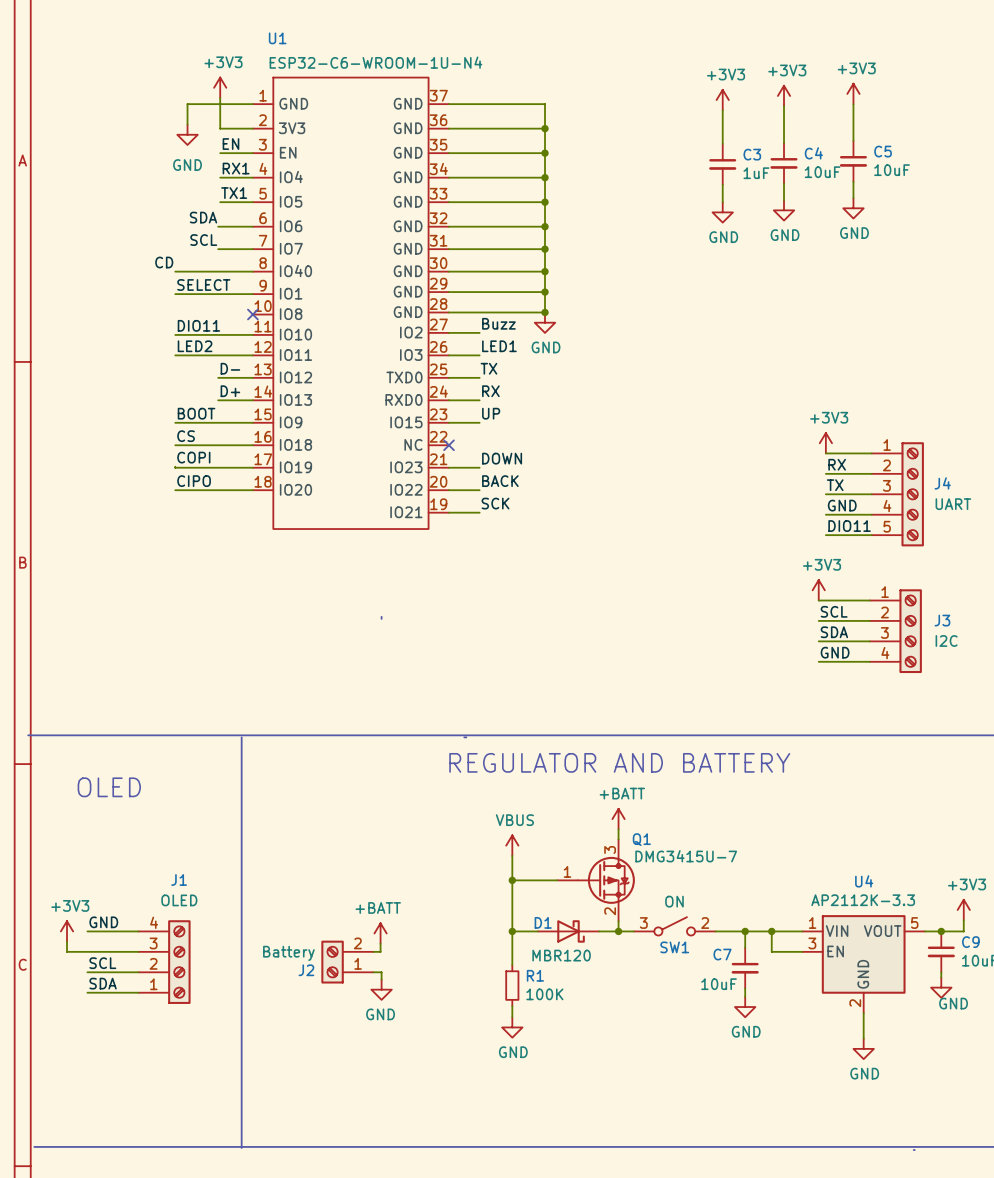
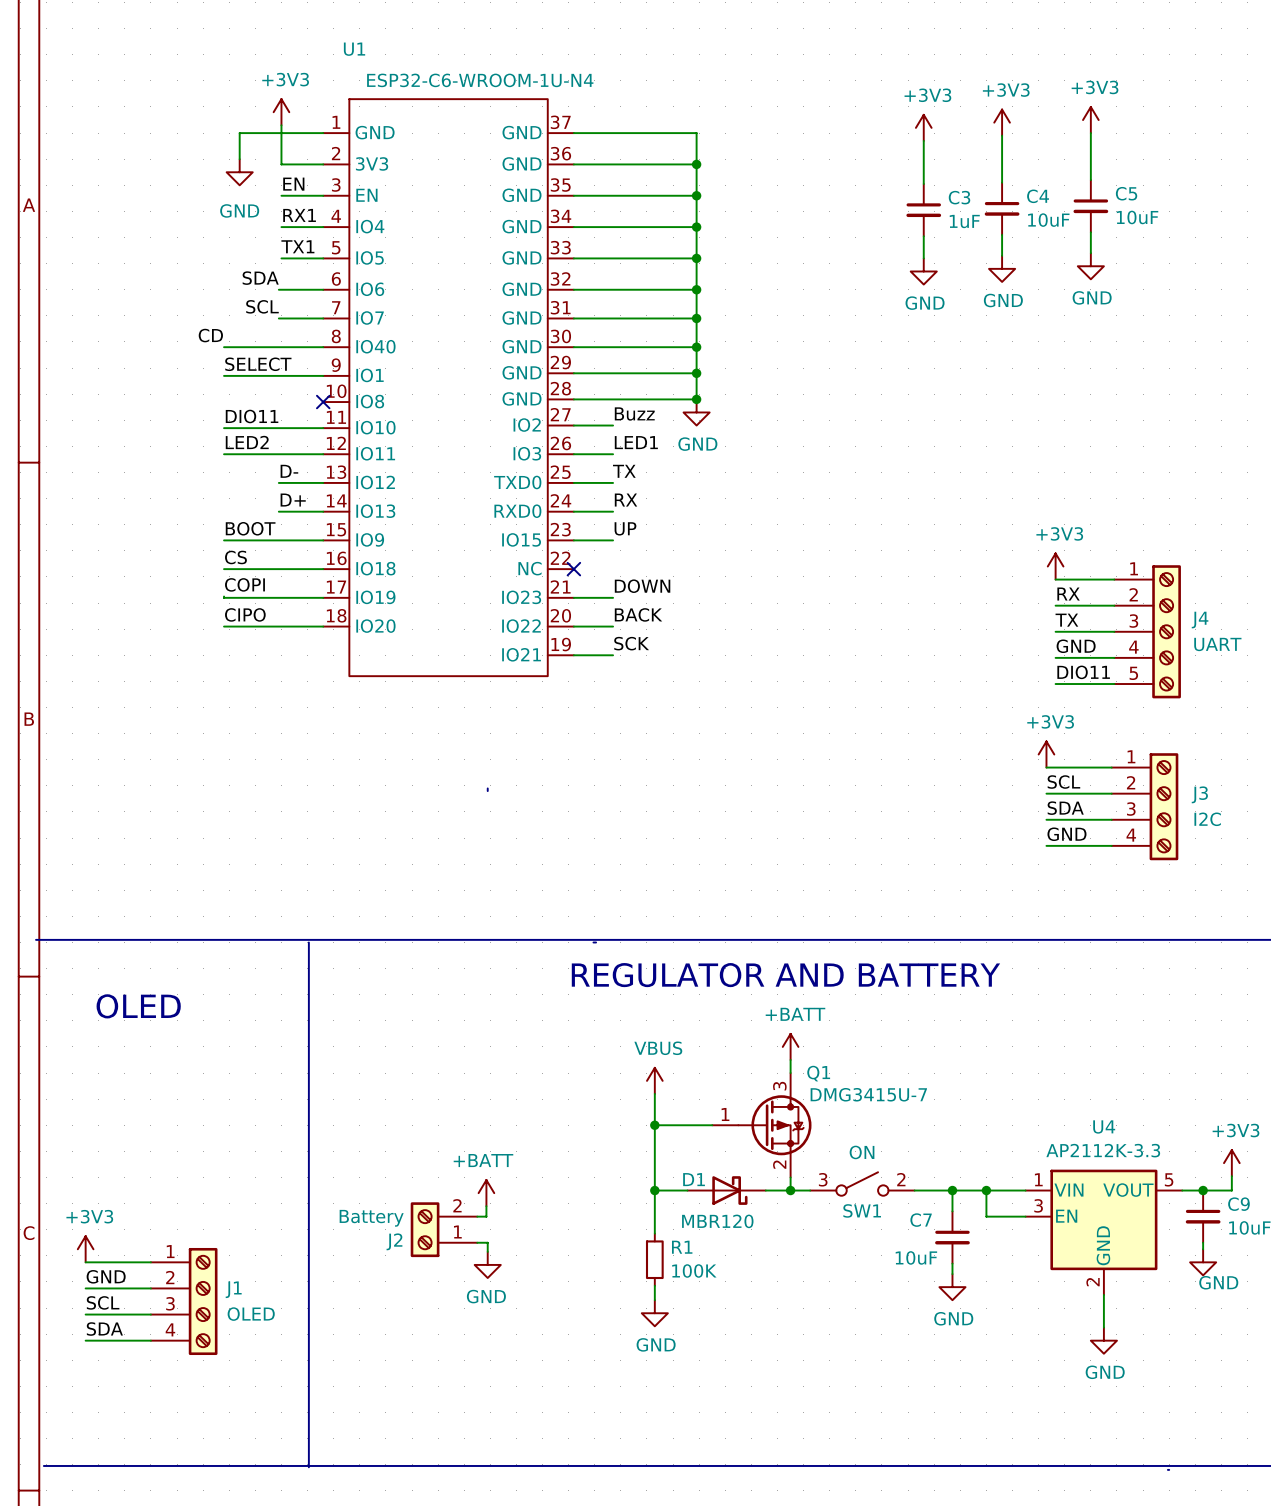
J1 name position: J1 (179, 879) -> J1 (233, 1289)
J1 value position: OLED (179, 900) -> OLED (251, 1314)
label position: GND (103, 922) -> GND (106, 1276)
power symbol position: +3V3 (67, 931) -> +3V3 (85, 1249)
wire: (87, 931) (138, 931) -> (85, 1262) (150, 1262)
wire: (67, 941) (67, 951) (138, 951) -> none
J1 position: (164, 962) -> (184, 1301)
J1 flip: as is (179, 962) -> up-down (203, 1301)
label position: SCL (102, 963) -> SCL (103, 1302)
wire: (87, 972) (138, 972) -> (85, 1314) (150, 1314)
label position: SDA (103, 983) -> SDA (104, 1329)
wire: (87, 992) (138, 992) -> (85, 1340) (150, 1340)
wire: none -> (85, 1288) (150, 1288)

